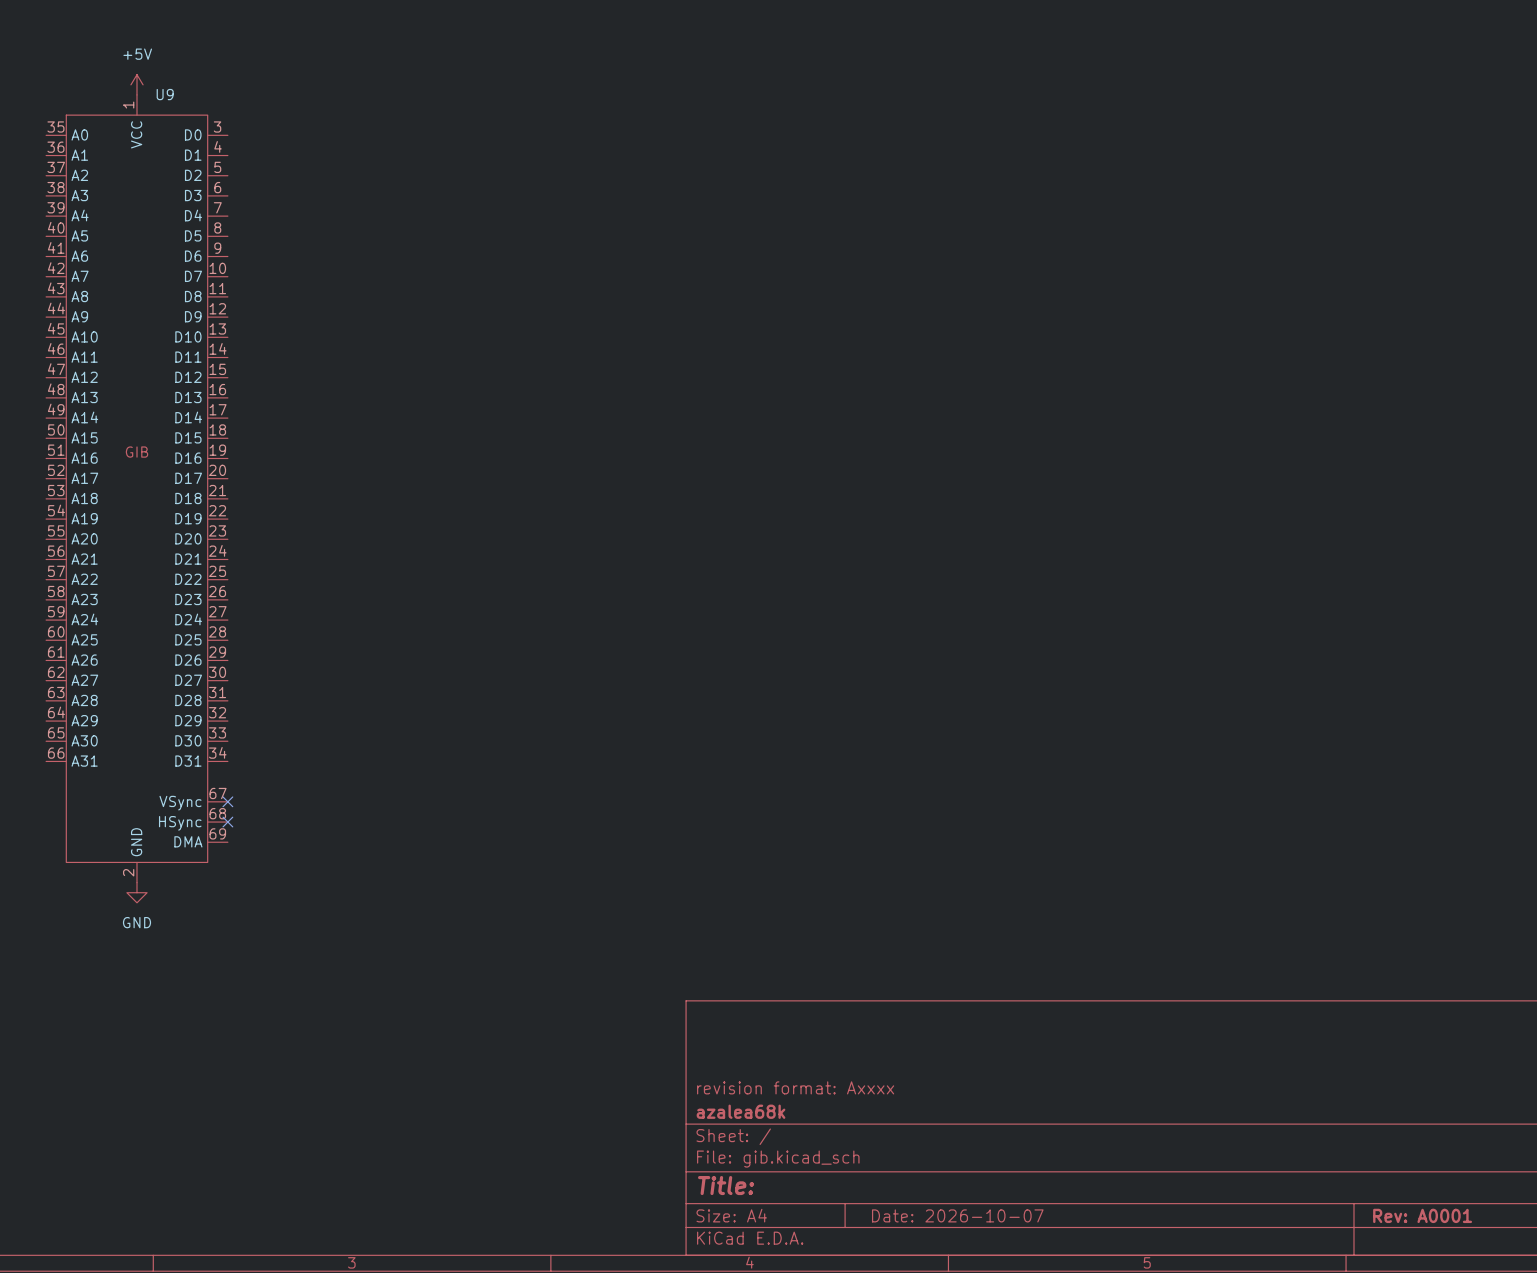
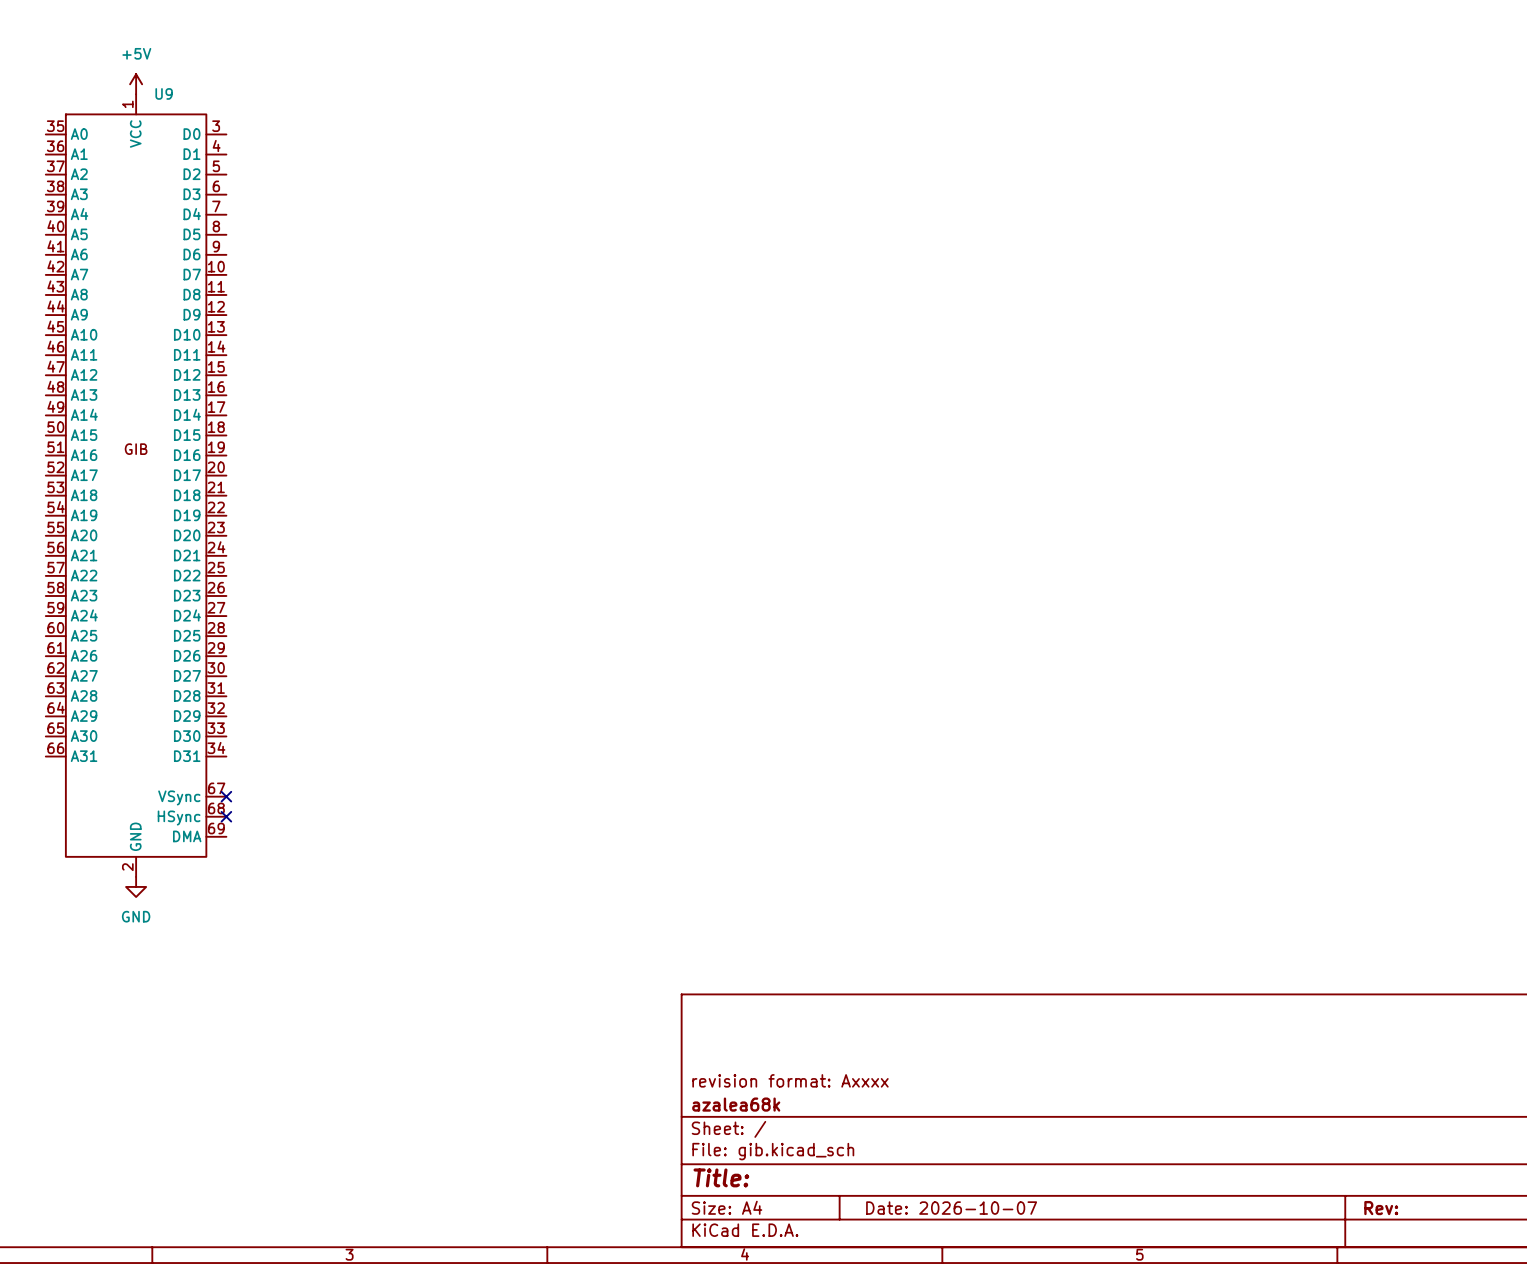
title block: Rev: A0001 (1422, 1215) -> Rev: (1381, 1208)

